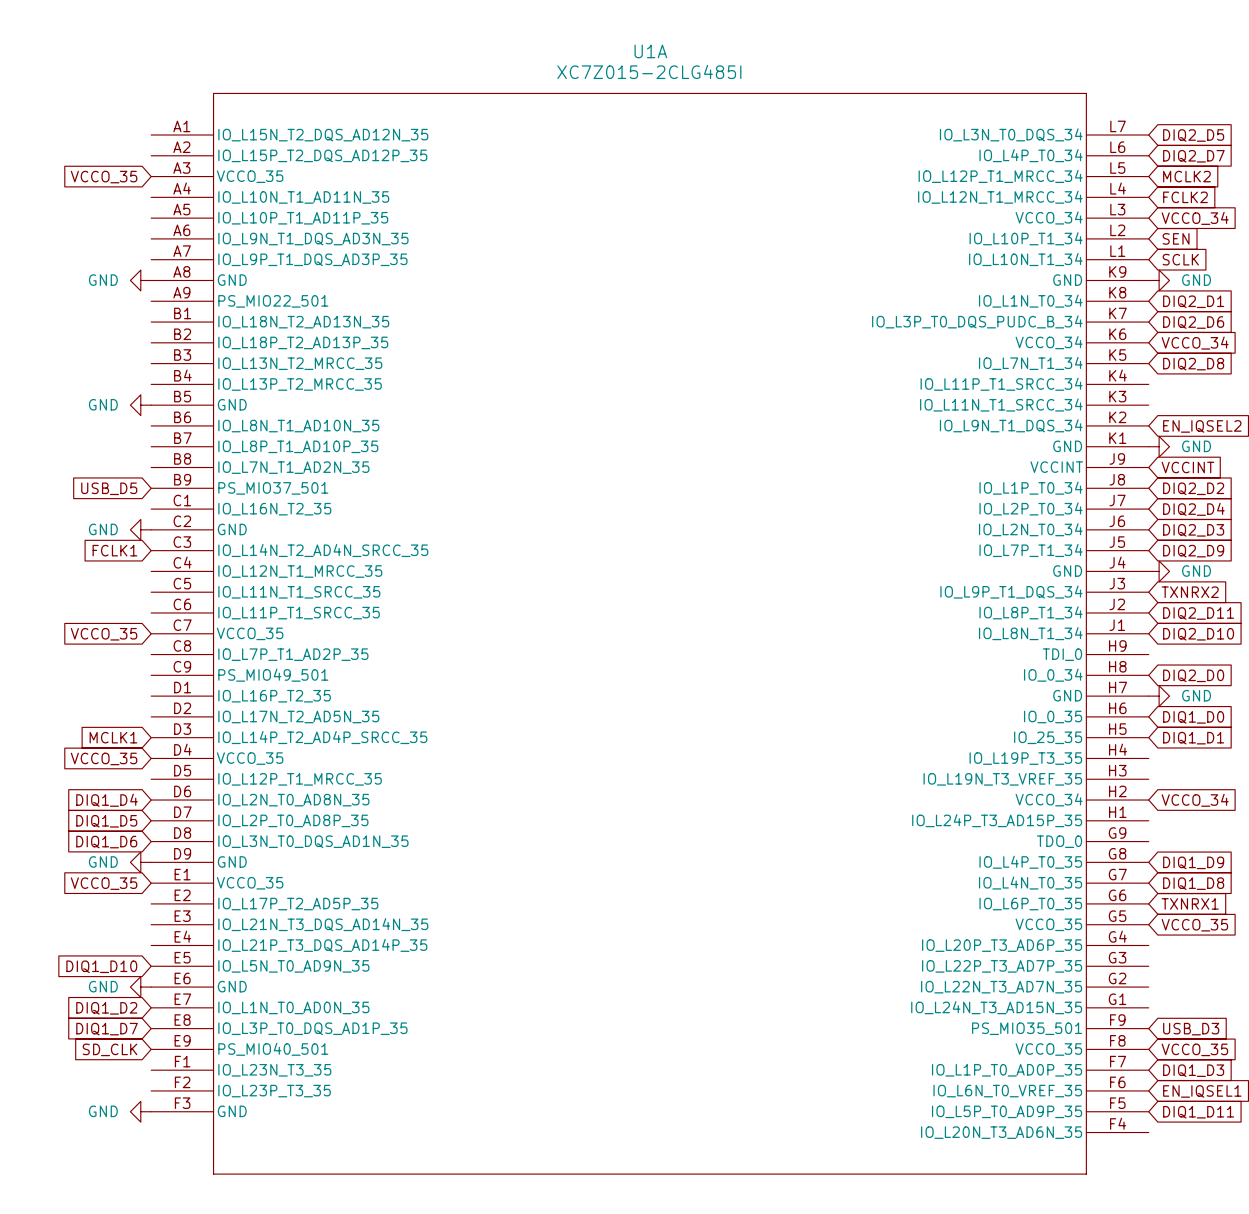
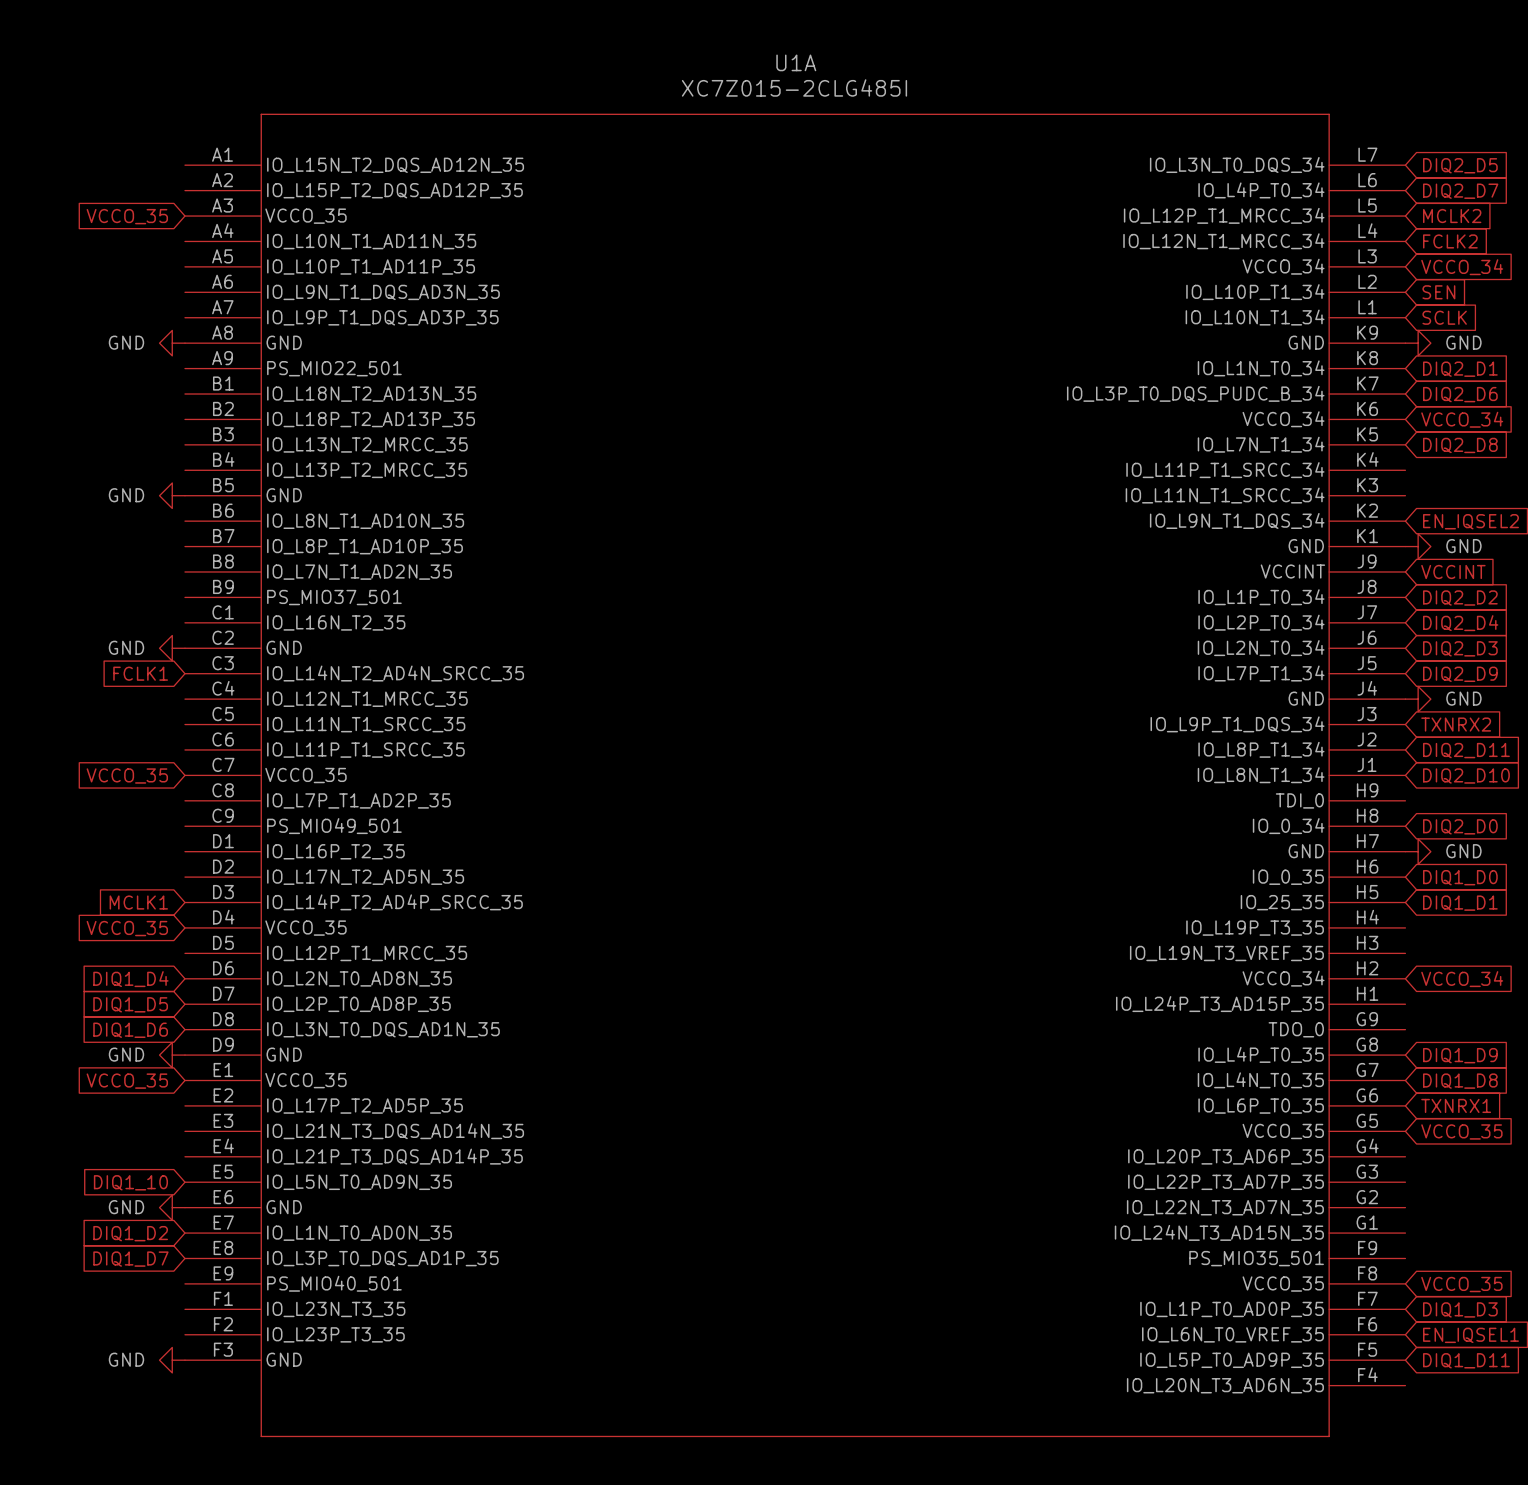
global label: USB_D5 (109, 488) -> none
global label: DIQ1_D10 (101, 966) -> DIQ1_10 (130, 1182)
global label: USB_D3 (1191, 1029) -> none
global label: SD_CLK (109, 1049) -> none

